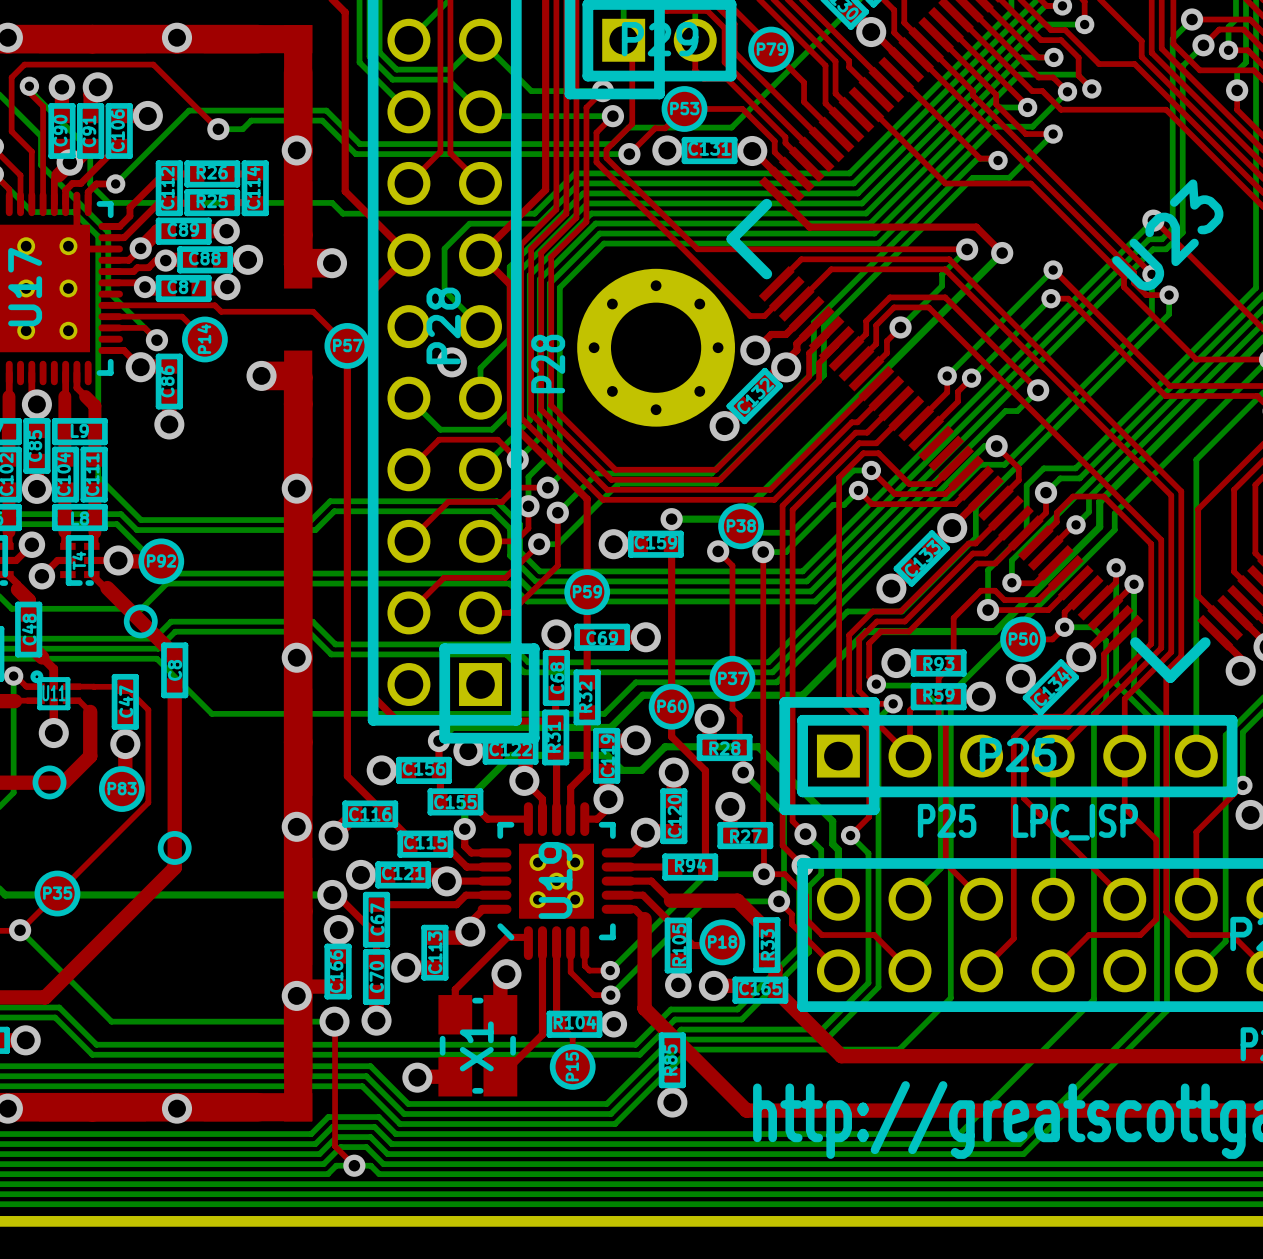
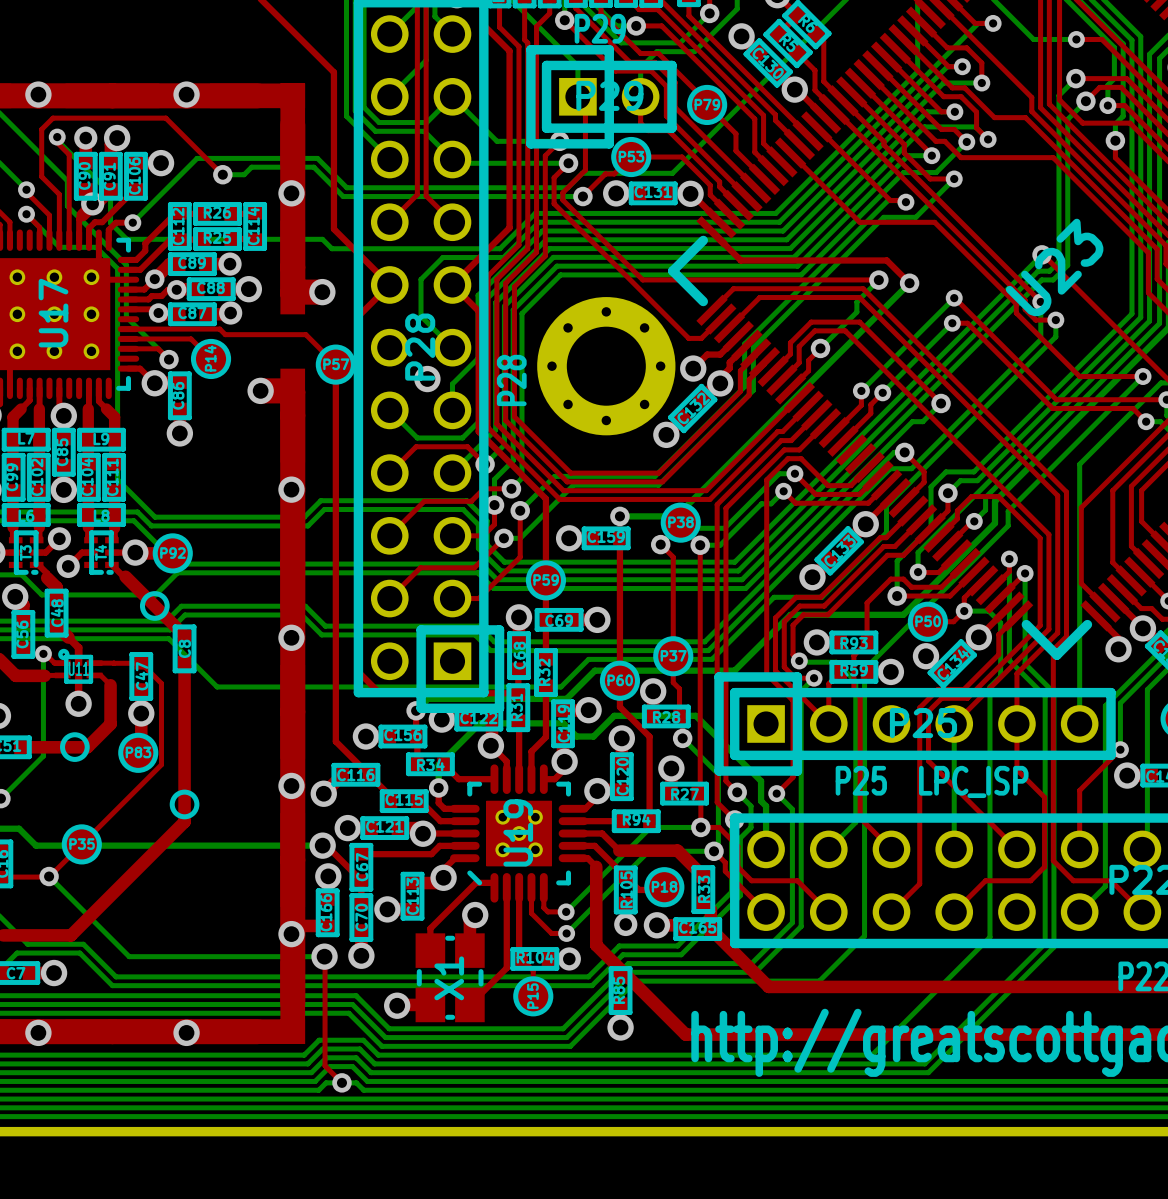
C155 name: C155 (455, 802) -> R34 (430, 764)

